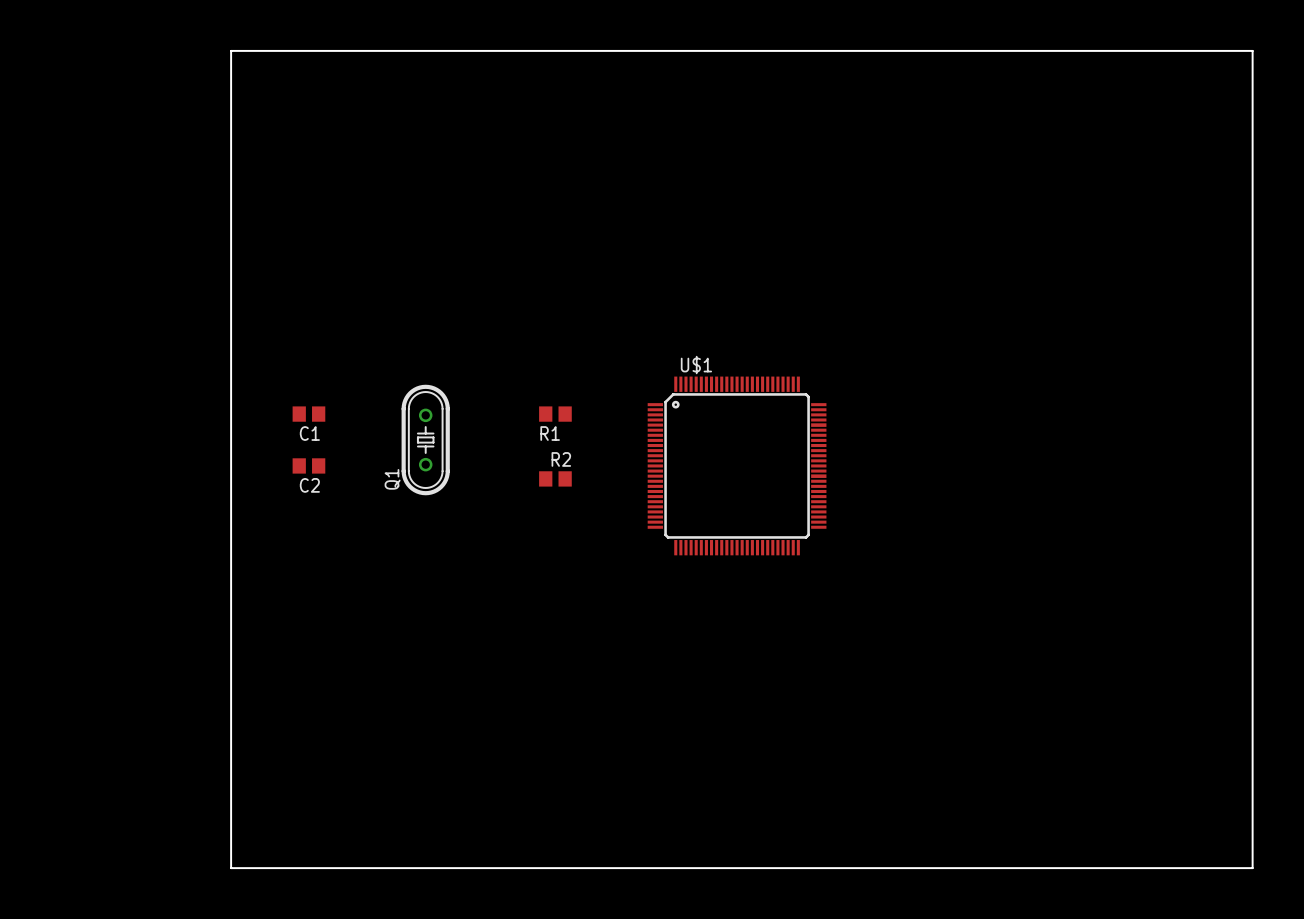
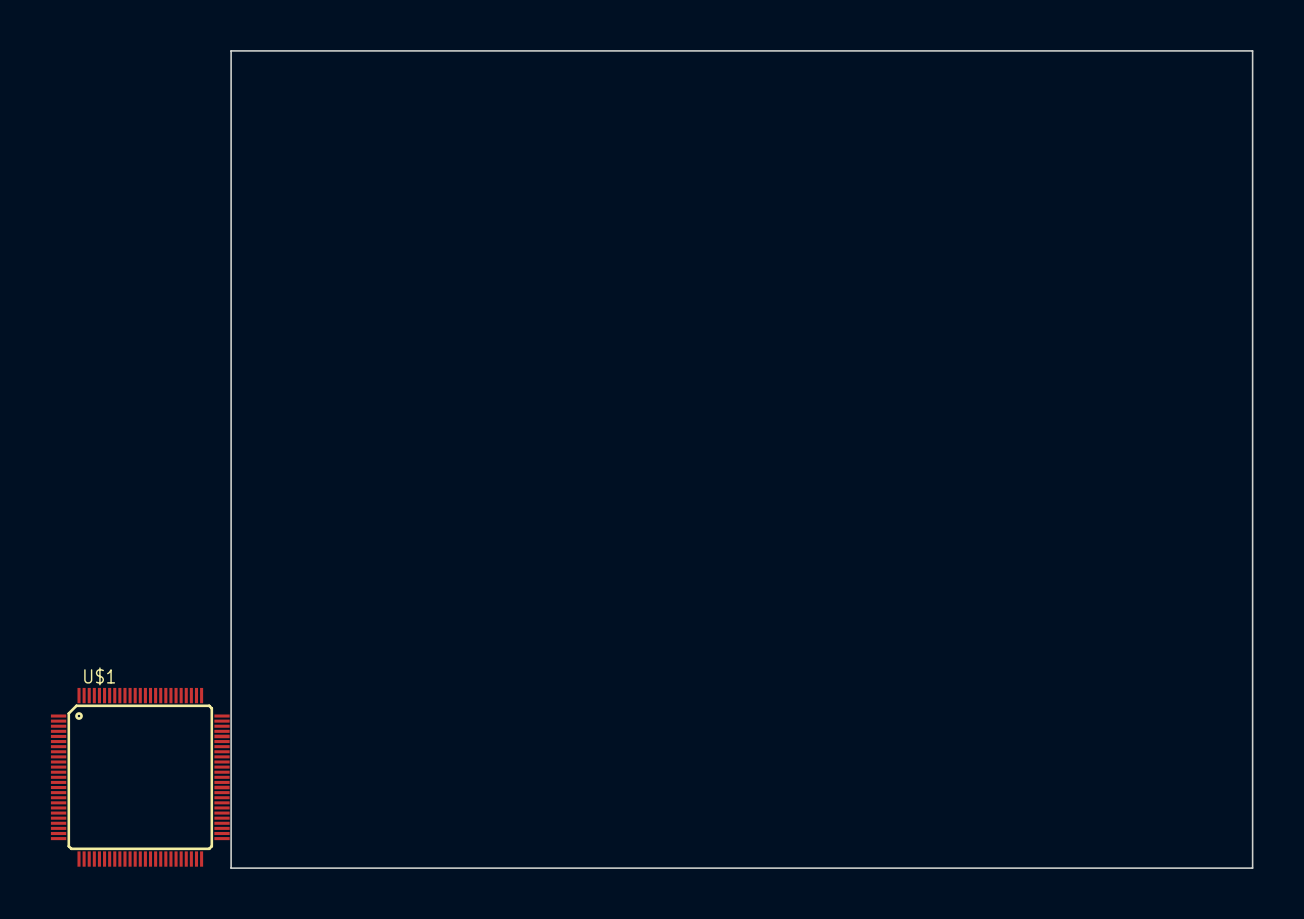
C1: (308, 414) -> none
R1: (555, 414) -> none
Q1: (425, 440) -> none
C2: (308, 465) -> none
U$1 position: (737, 465) -> (140, 777)
R2: (555, 478) -> none

